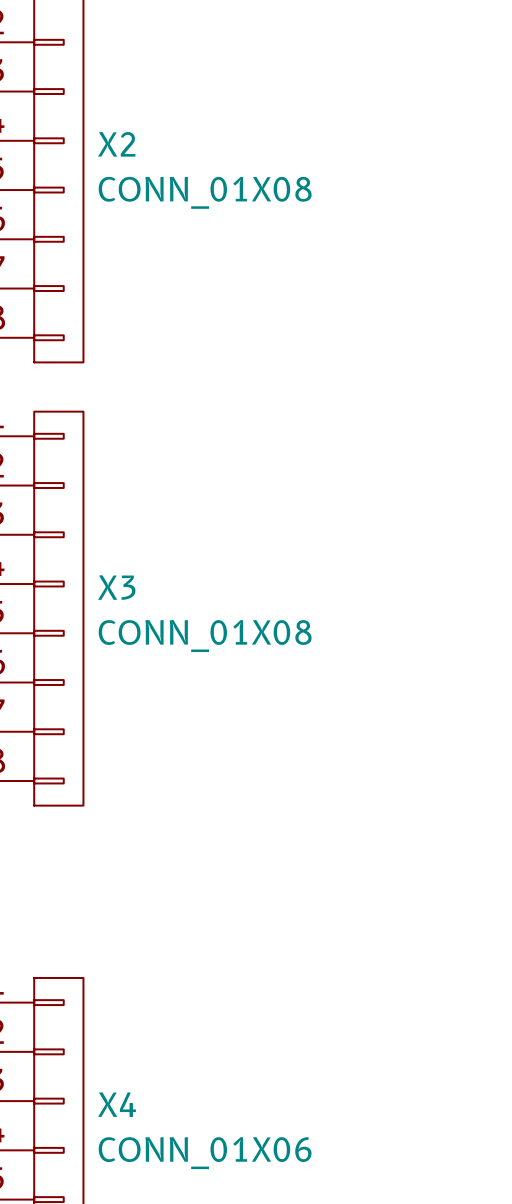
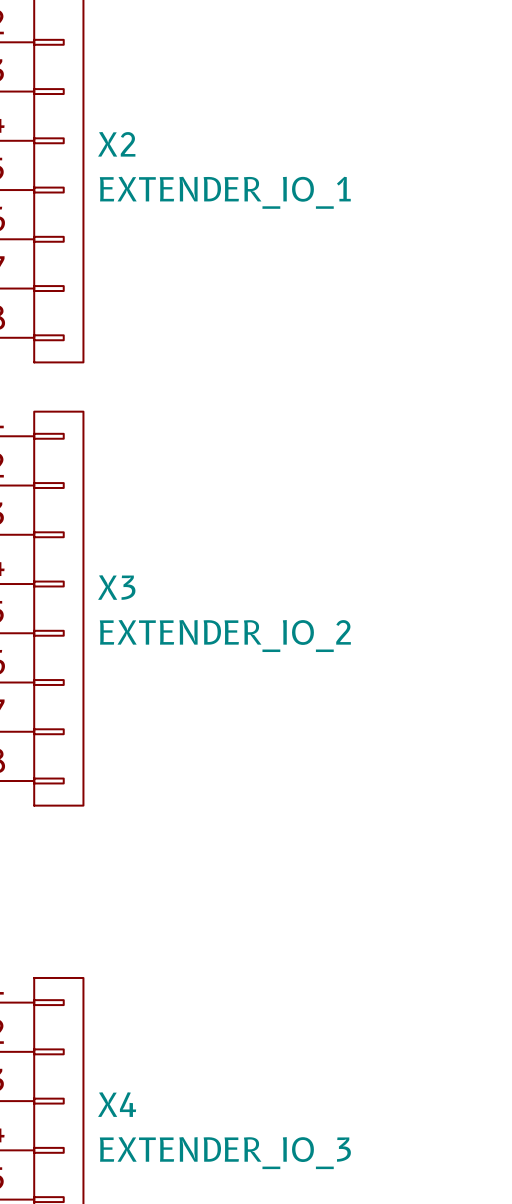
X2 value: CONN_01X08 (205, 192) -> EXTENDER_IO_1 (225, 192)
X3 value: CONN_01X08 (205, 636) -> EXTENDER_IO_2 (225, 636)
X4 value: CONN_01X06 (205, 1153) -> EXTENDER_IO_3 (225, 1153)

